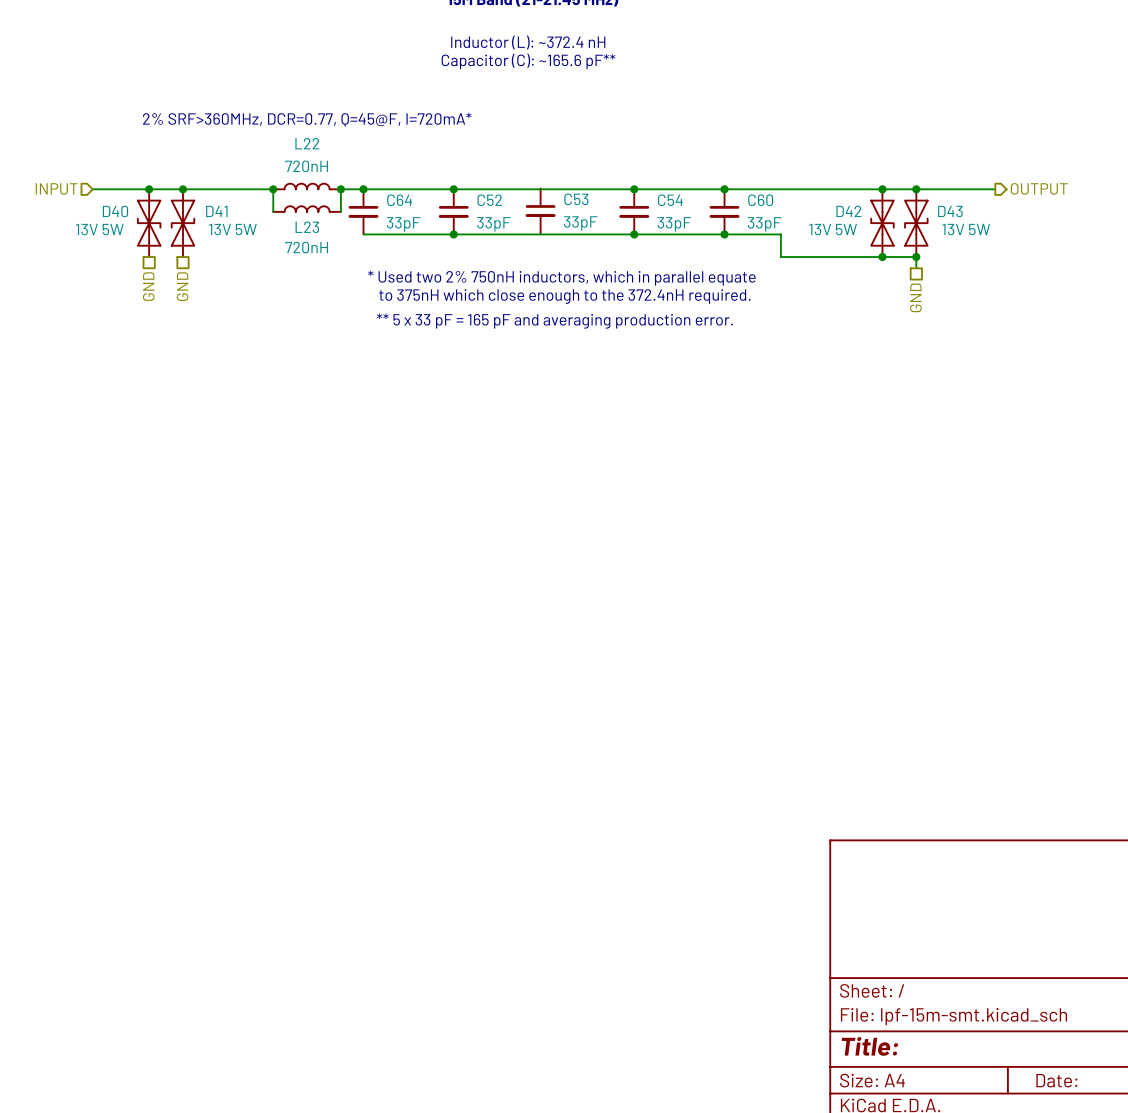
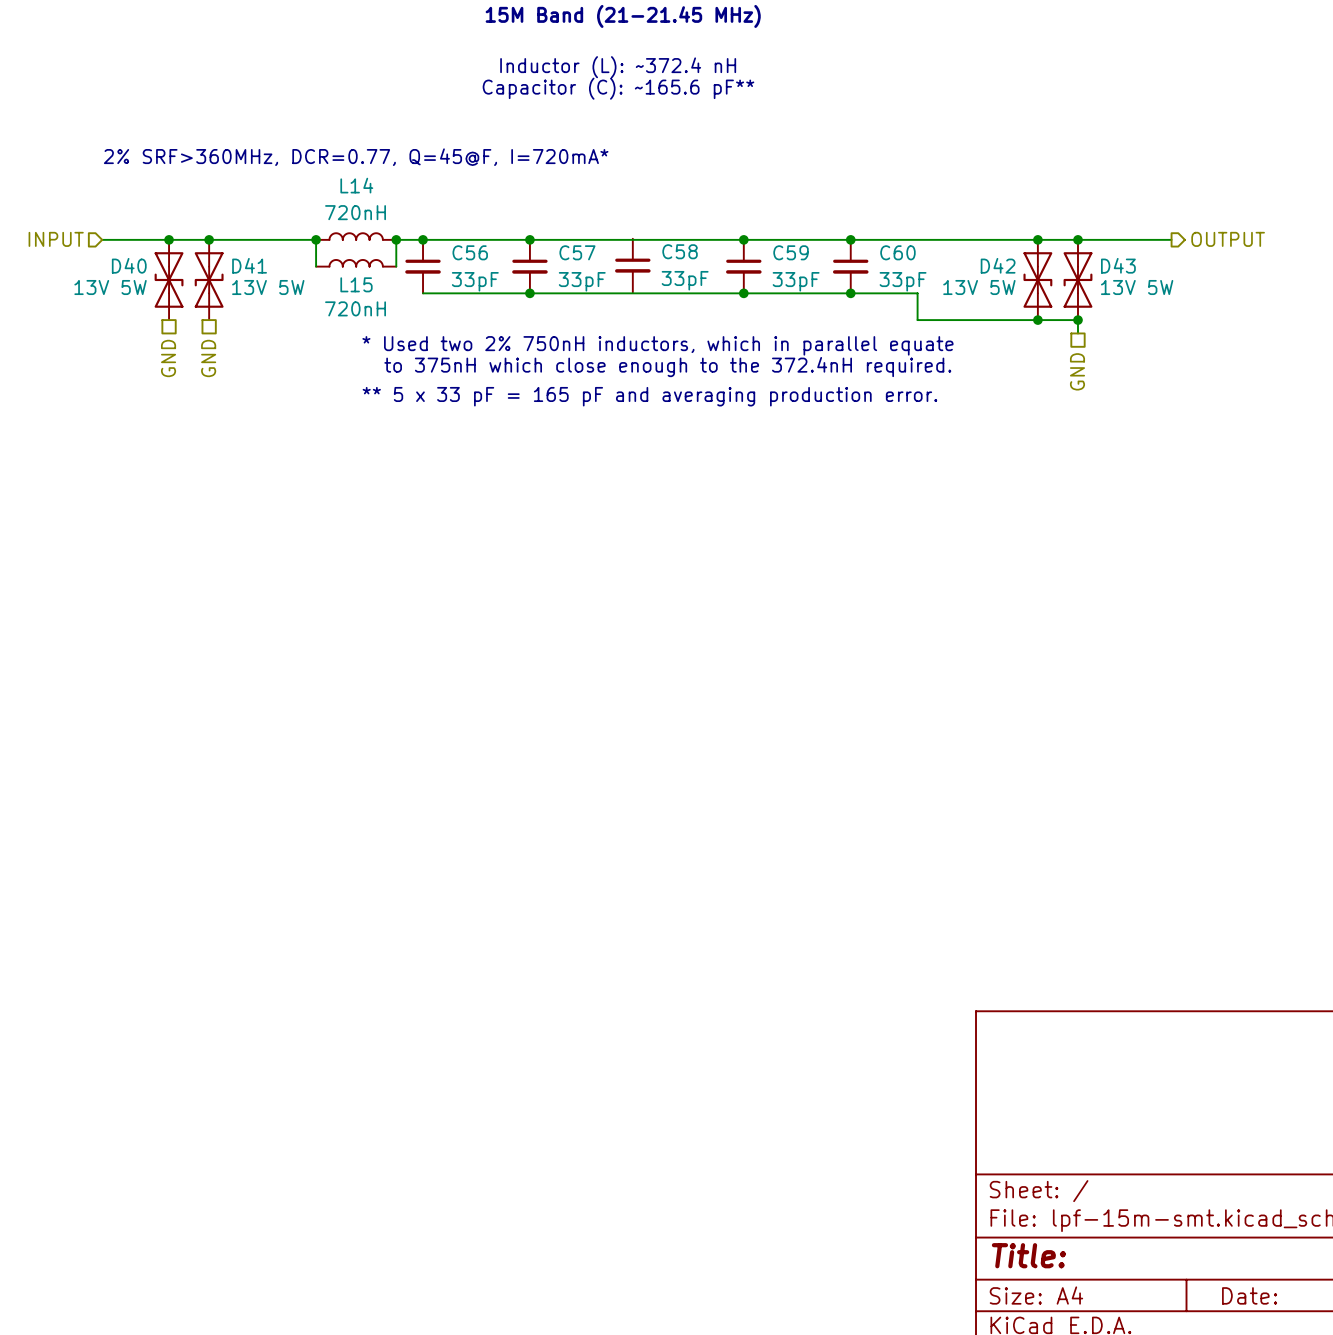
L22 name: L22 (307, 143) -> L14 (356, 185)
C53 name: C53 (576, 199) -> C58 (680, 251)
C64 name: C64 (399, 200) -> C56 (470, 252)
C52 name: C52 (489, 200) -> C57 (577, 252)
C54 name: C54 (670, 200) -> C59 (791, 252)
L23 name: L23 (307, 227) -> L15 (356, 284)

